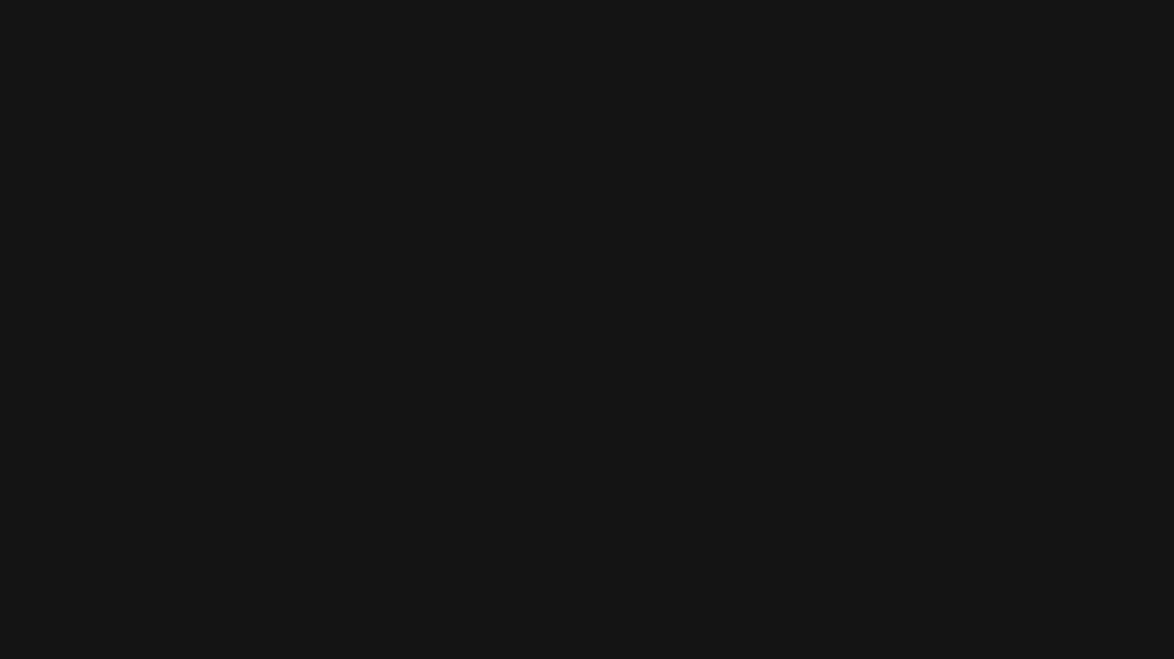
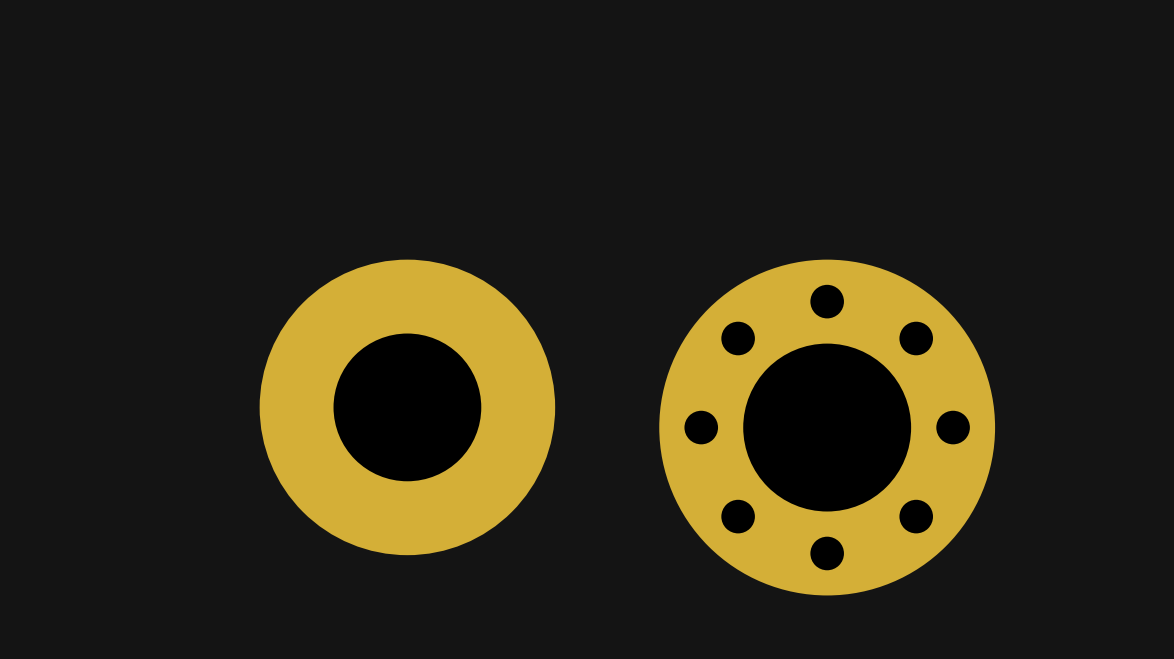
part: none -> (407, 407)
part: none -> (827, 427)

